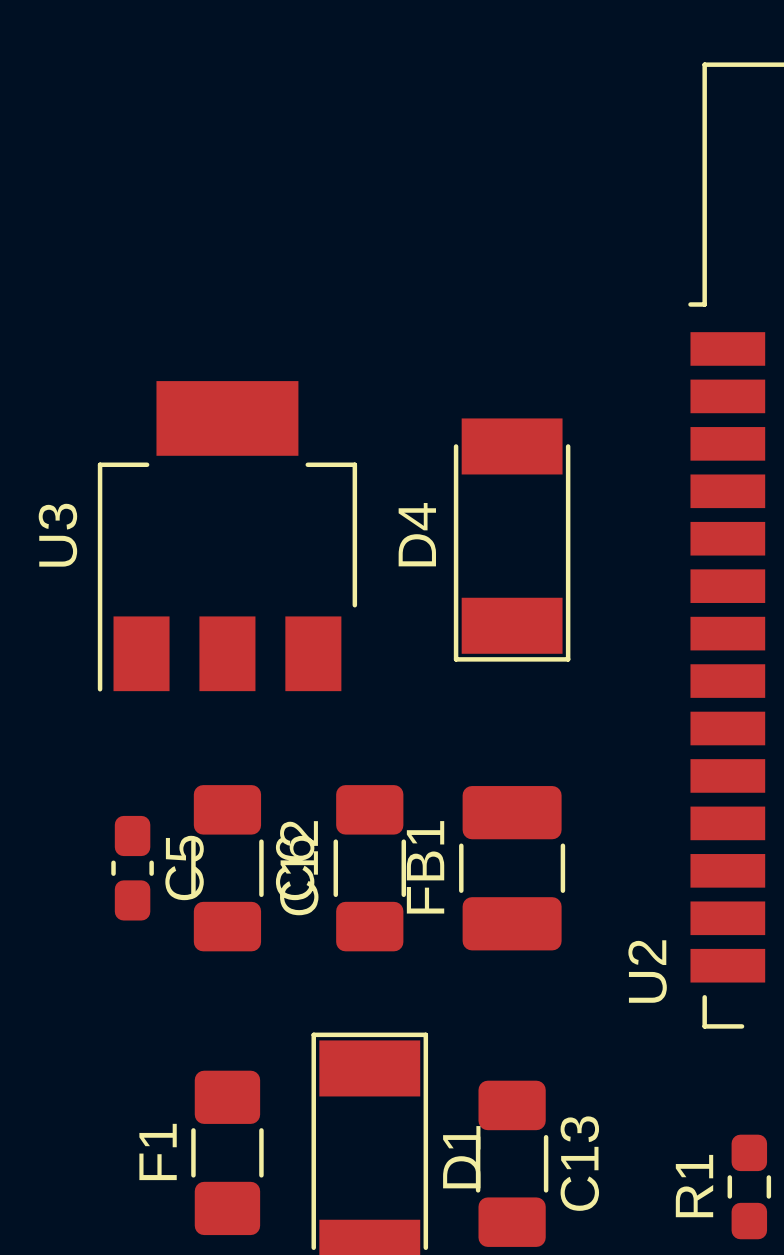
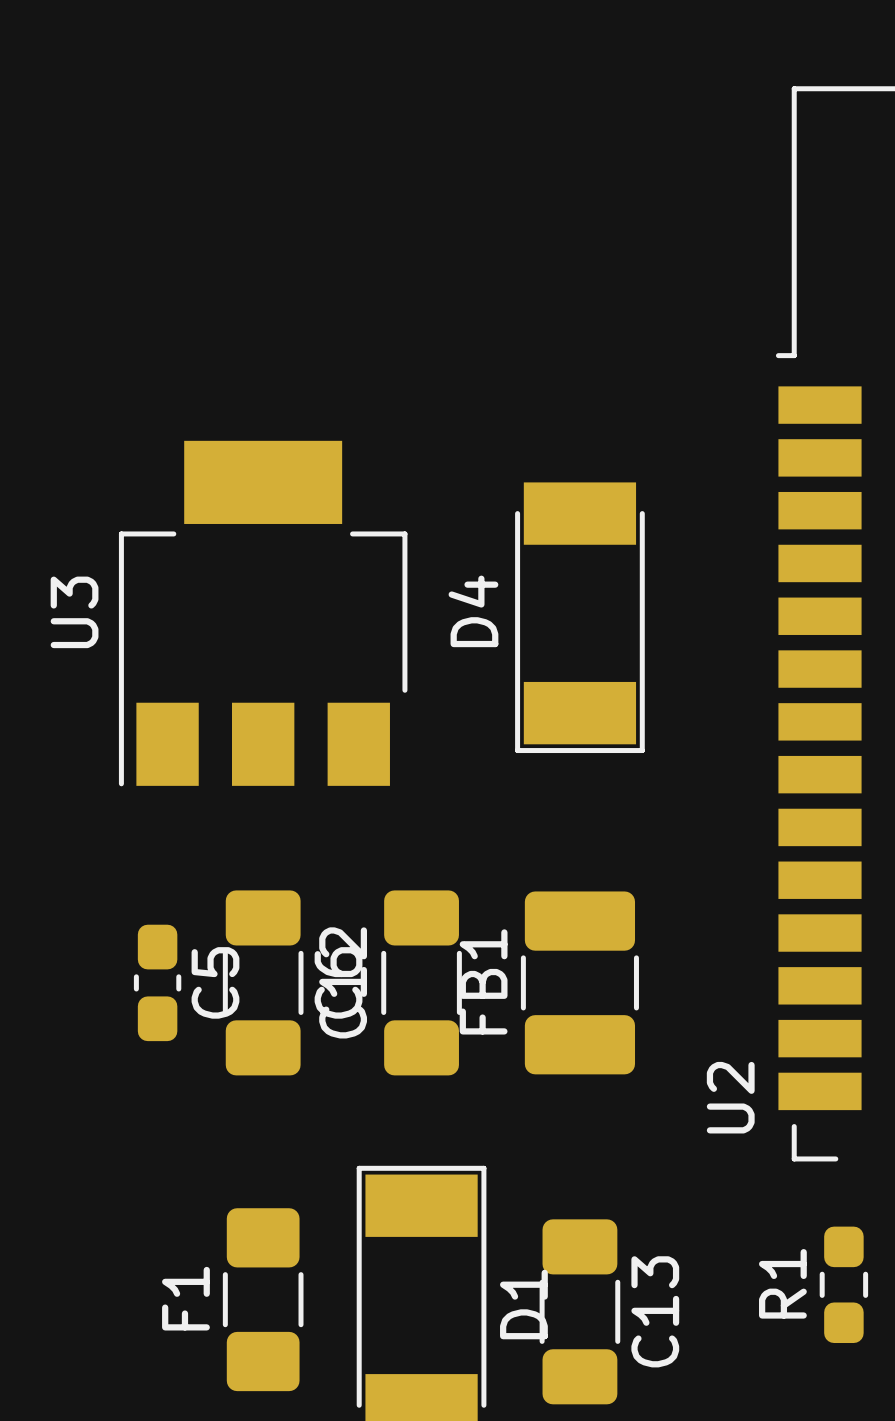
R1 position: (749, 1186) -> (843, 1284)

